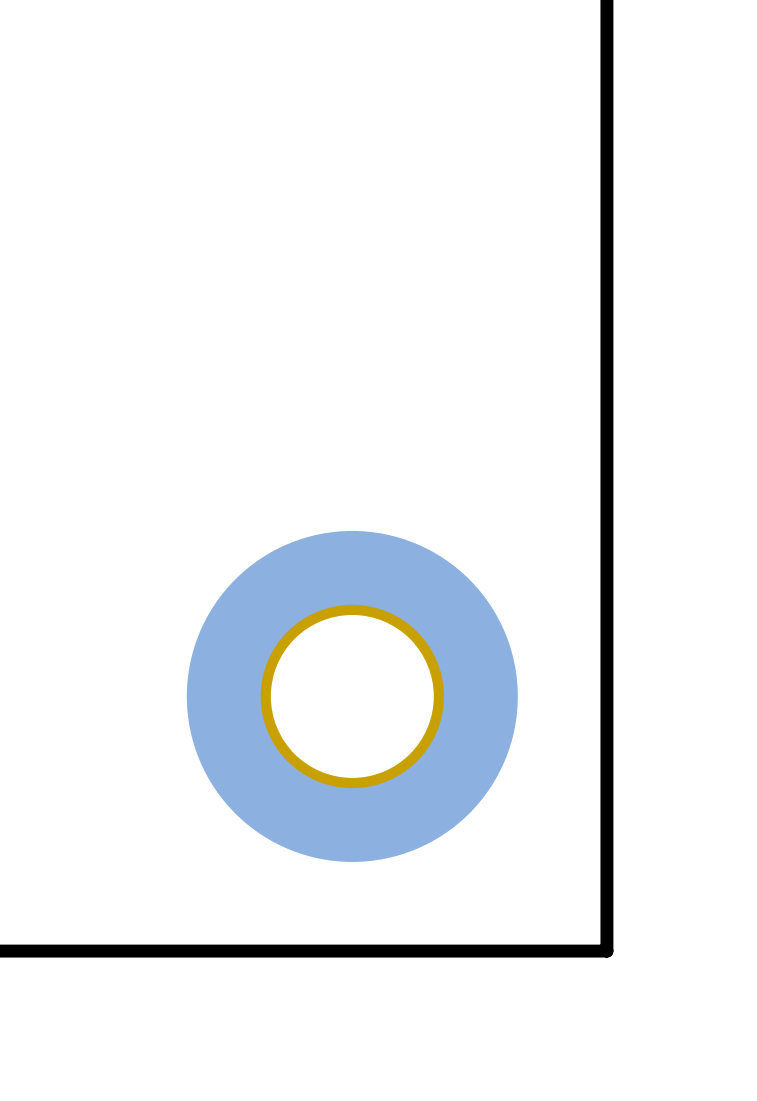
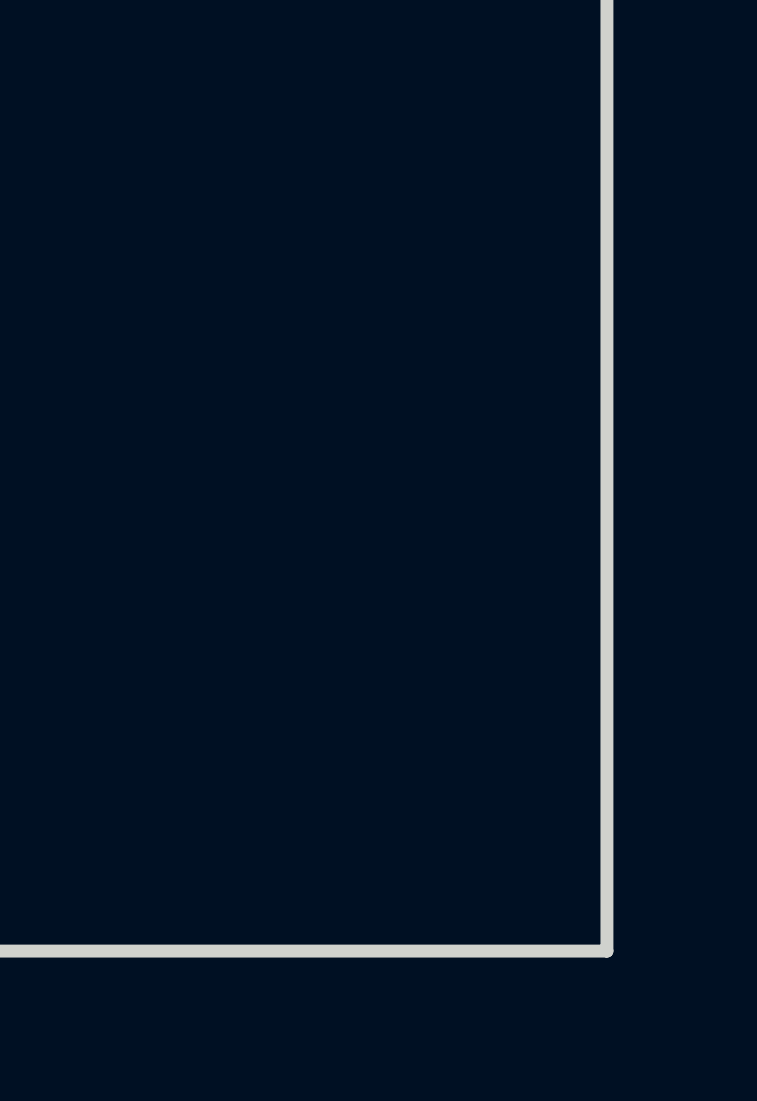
part: (352, 696) -> none

